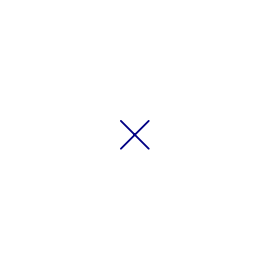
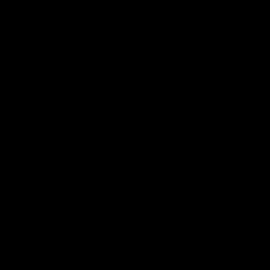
no-connect mark: (134, 134) -> none

